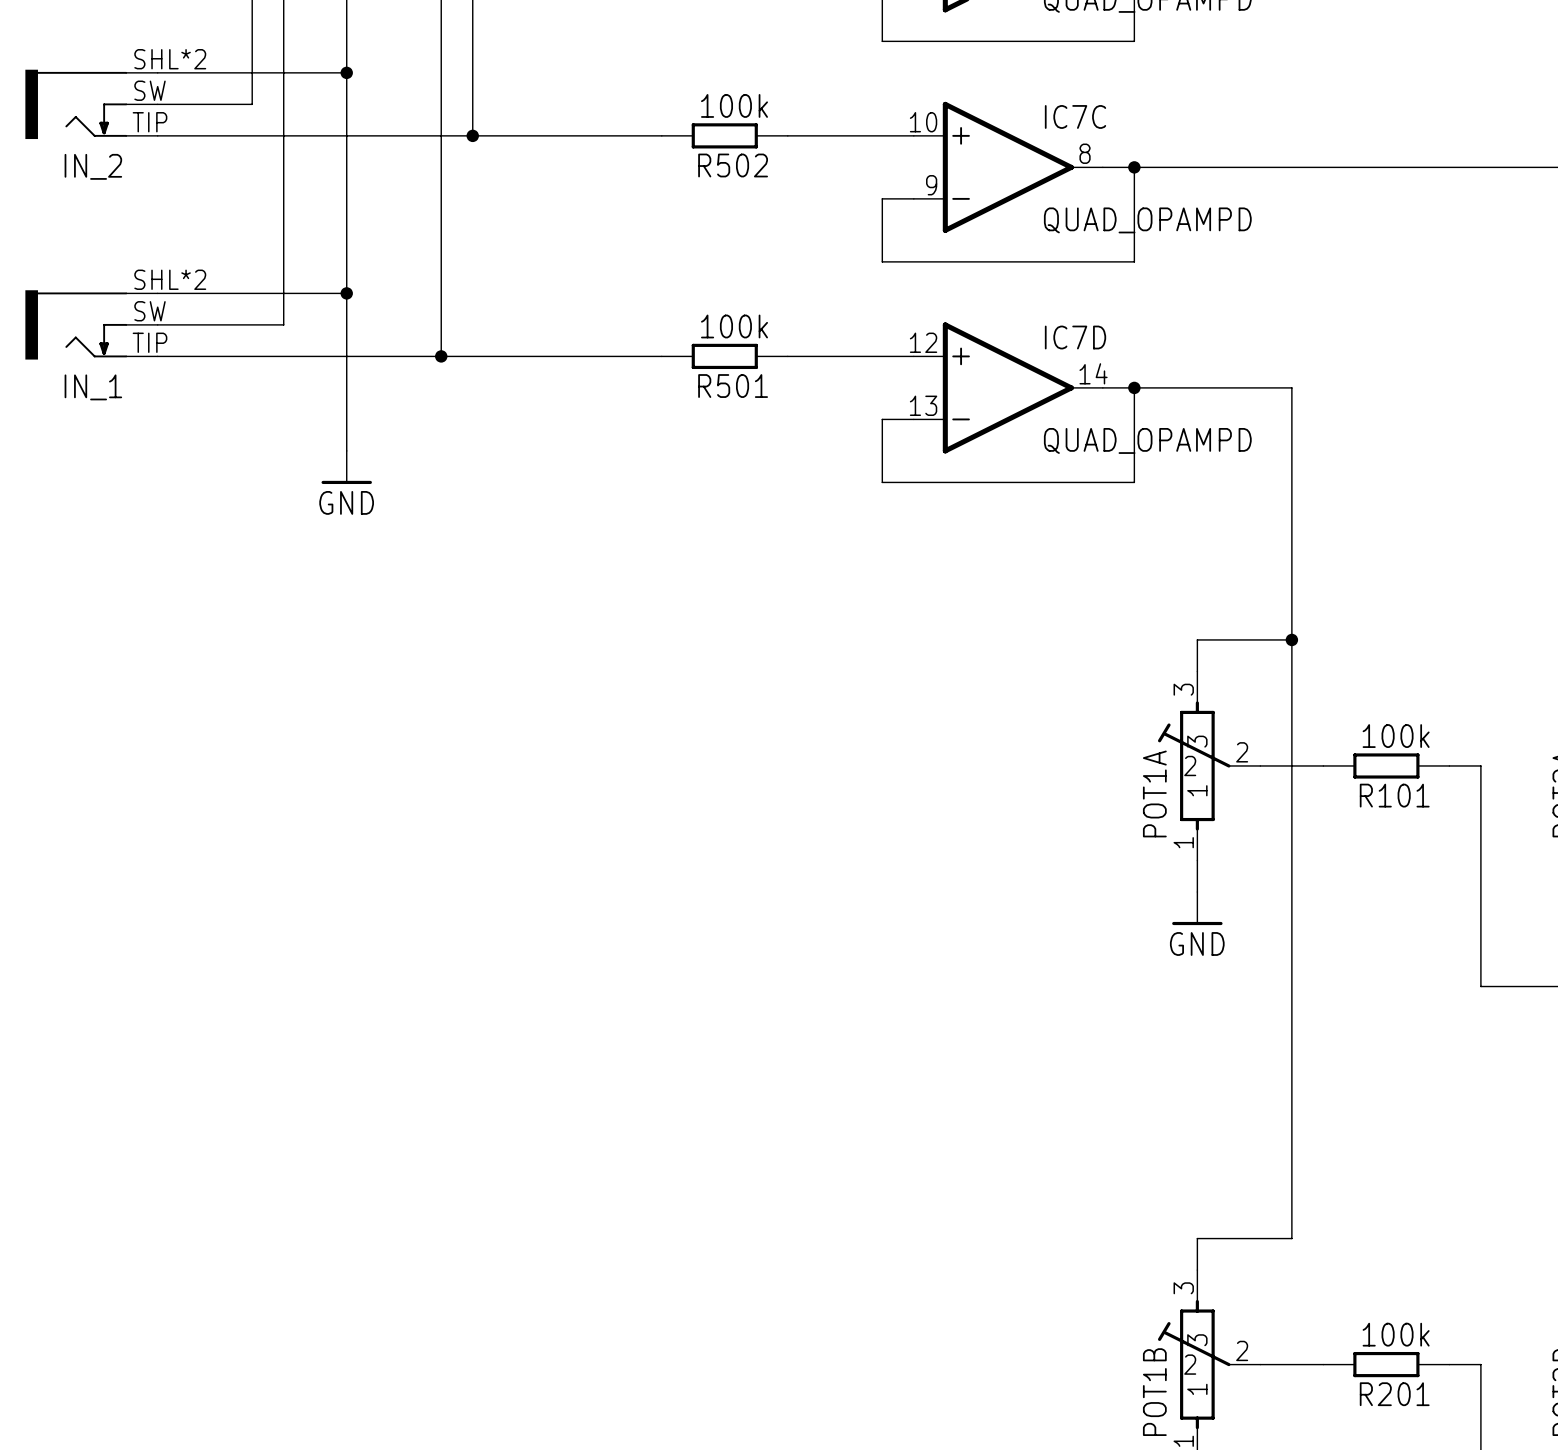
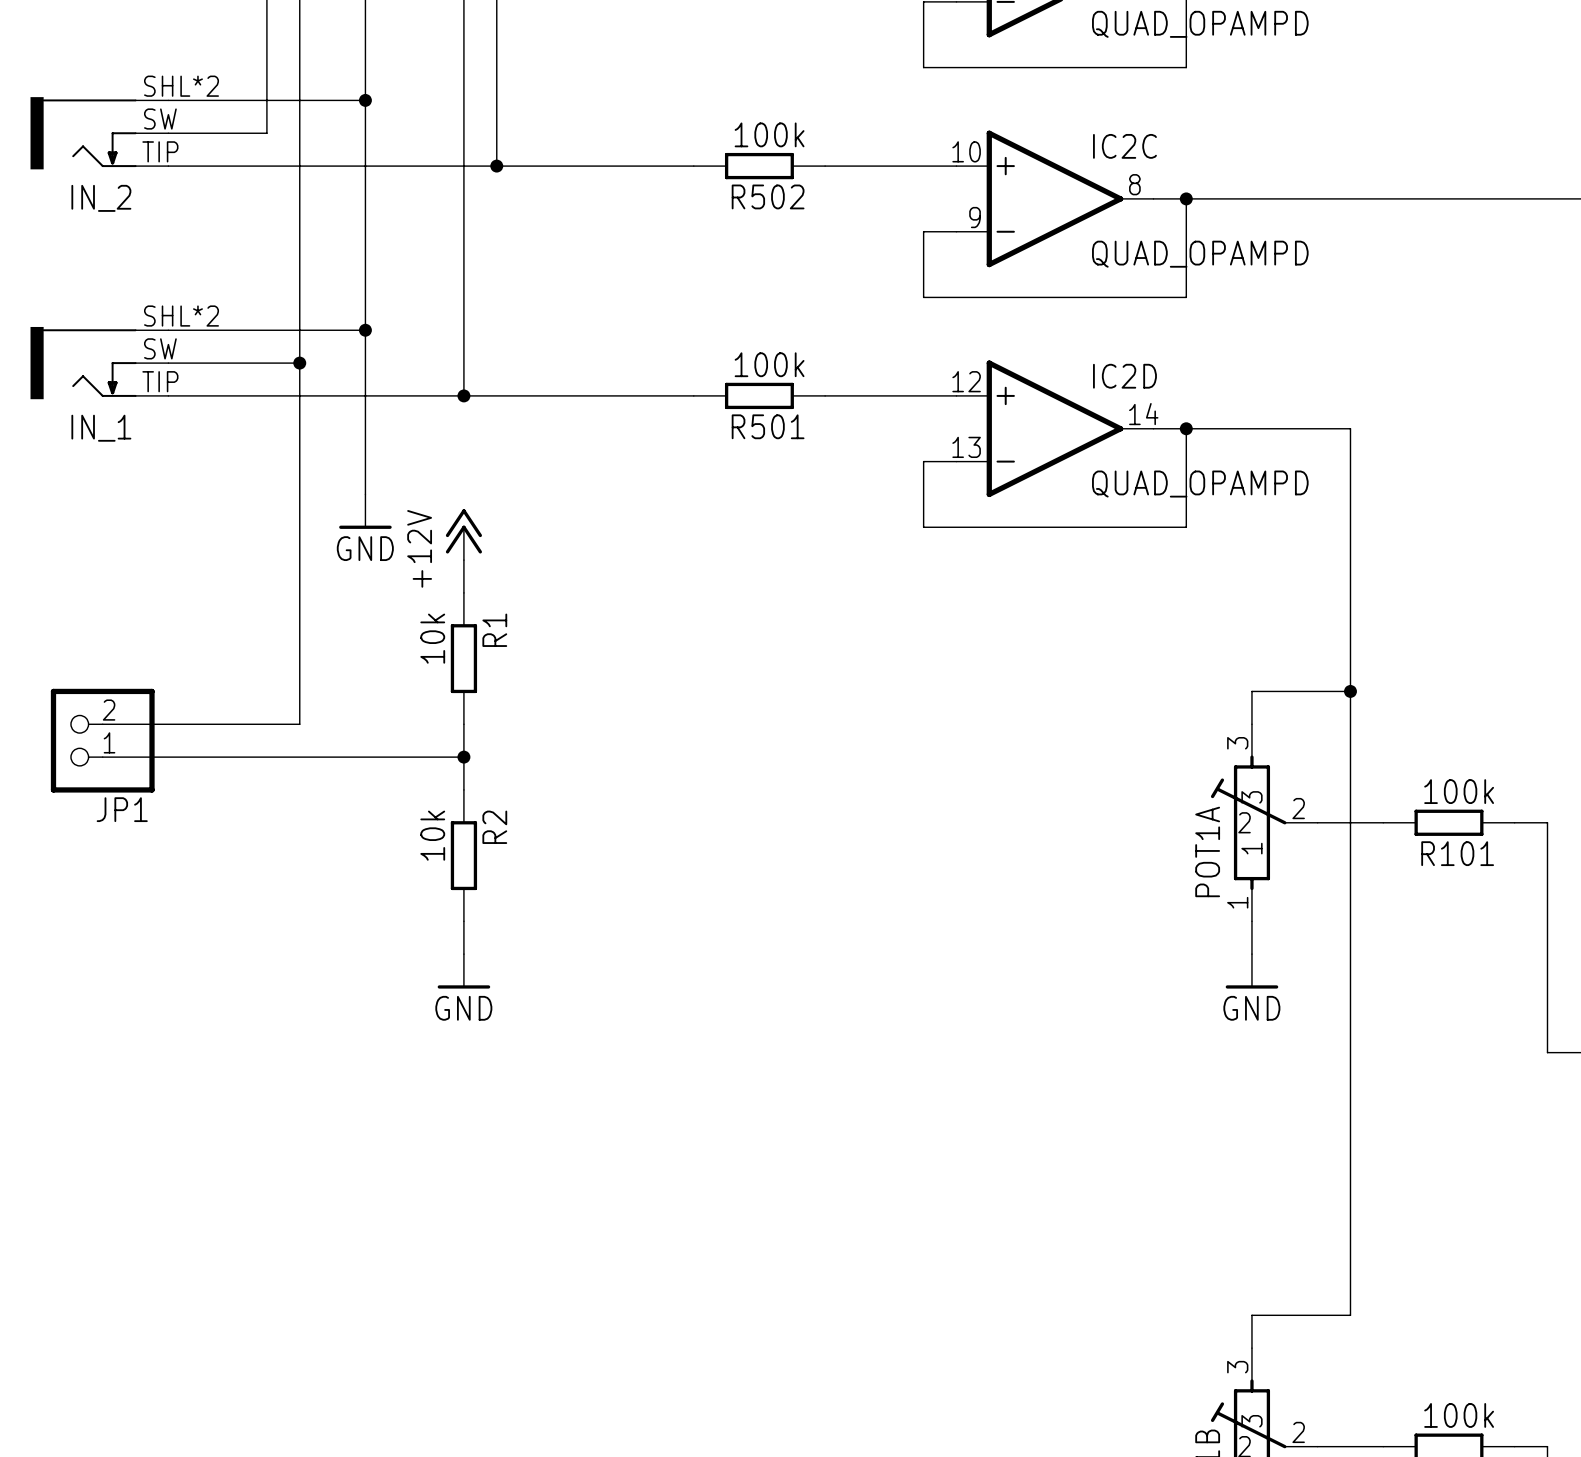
IC7C name: IC7C (1075, 116) -> IC2C (1124, 146)
wire: none -> (299, 363) (299, 724) (102, 724)
junction: none -> (299, 363)
IC7D name: IC7D (1075, 337) -> IC2D (1124, 376)
power symbol: none -> +12V (463, 534)
wire: none -> (463, 560) (463, 592)
R1: none -> 10k (463, 658)
wire: none -> (463, 724) (463, 789)
JP1: none -> (102, 740)
wire: none -> (102, 757) (463, 757)
junction: none -> (463, 757)
R2: none -> 10k (463, 855)
wire: none -> (463, 921) (463, 954)
power symbol: none -> GND (463, 971)

